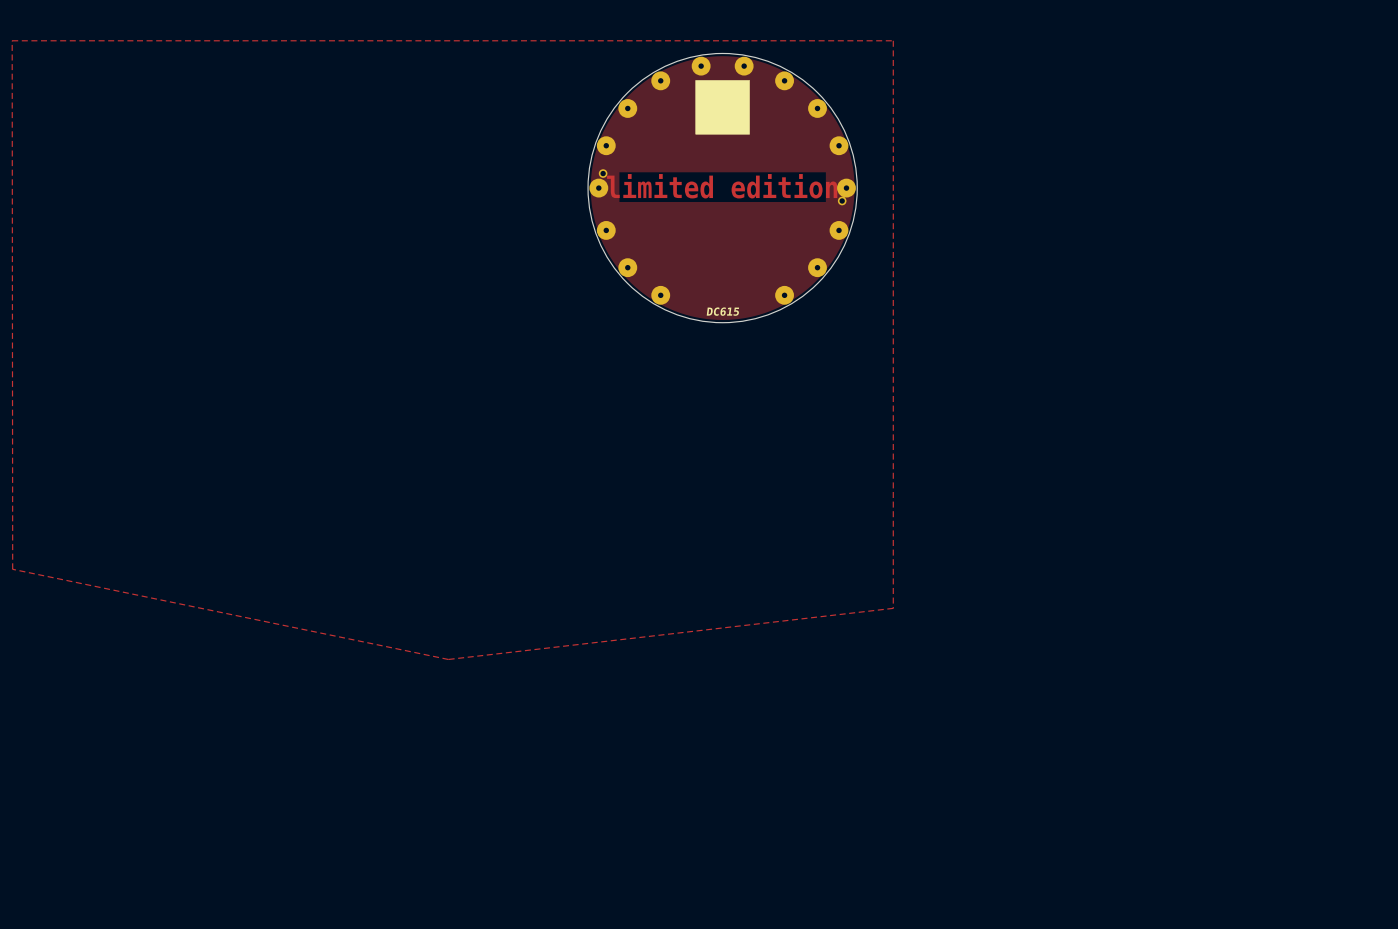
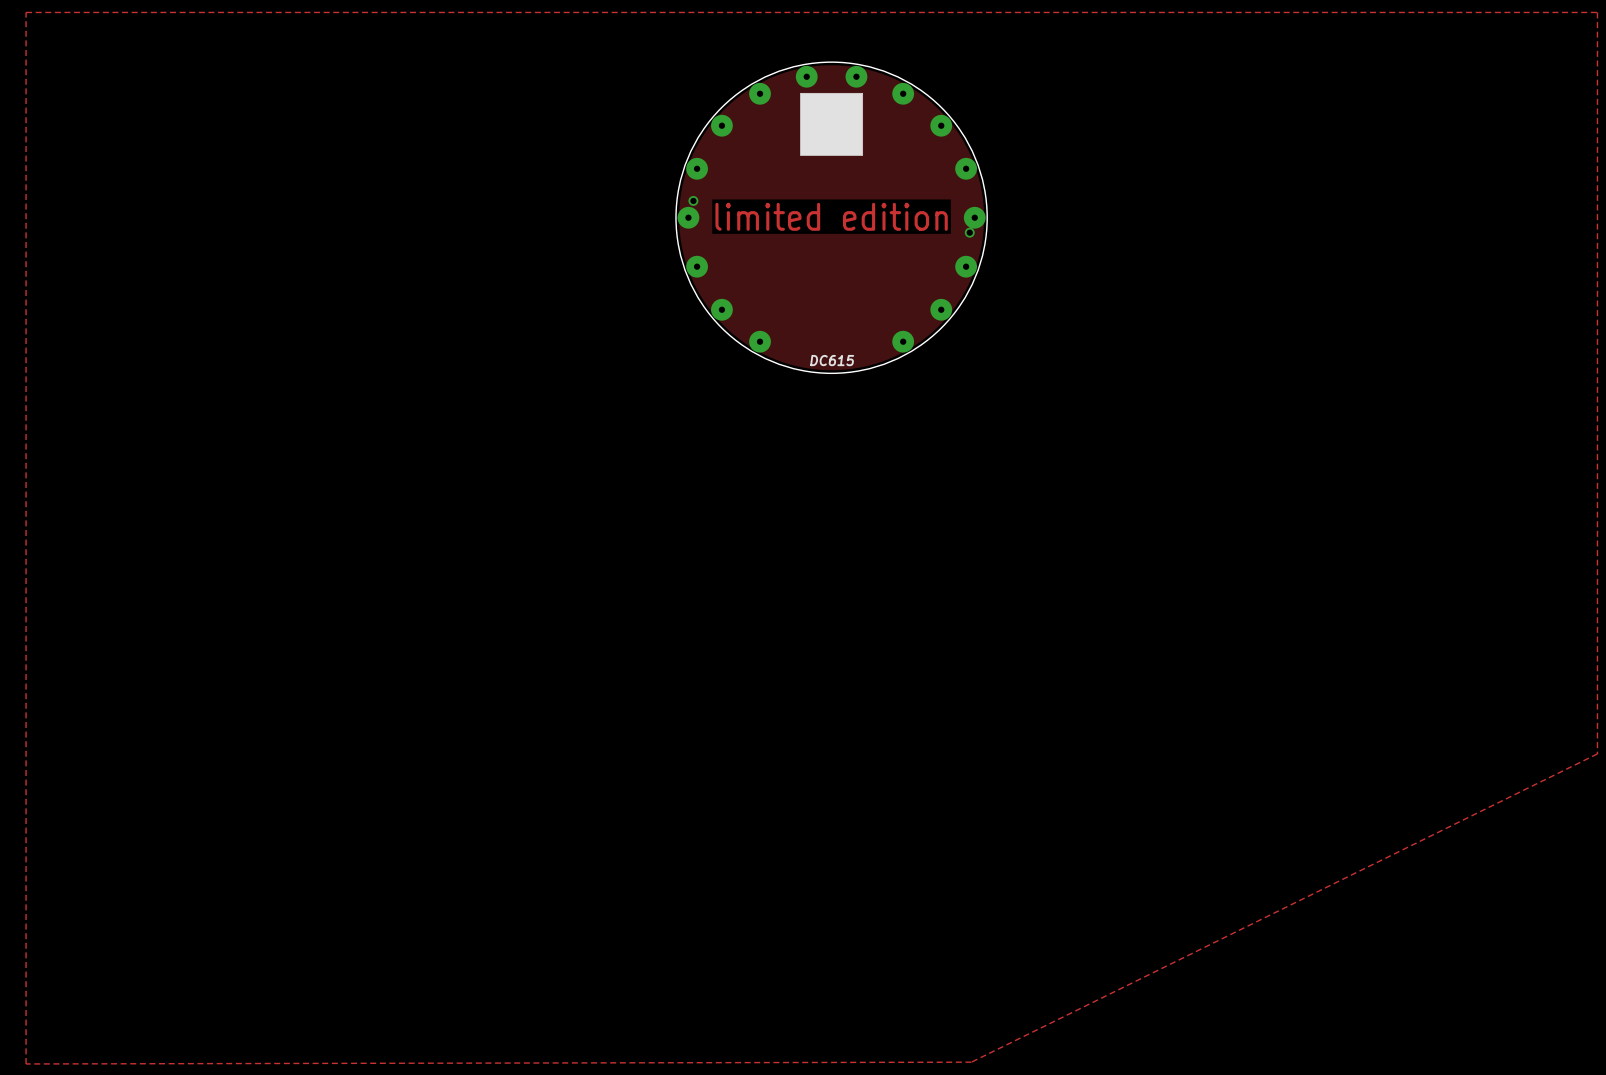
zone outline: none -> (26, 12) (1597, 12) (1597, 753) (971, 1062) (26, 1063) (26, 12)
zone outline: (12, 40) (893, 40) (893, 608) (448, 659) (12, 569) (12, 40) -> none

